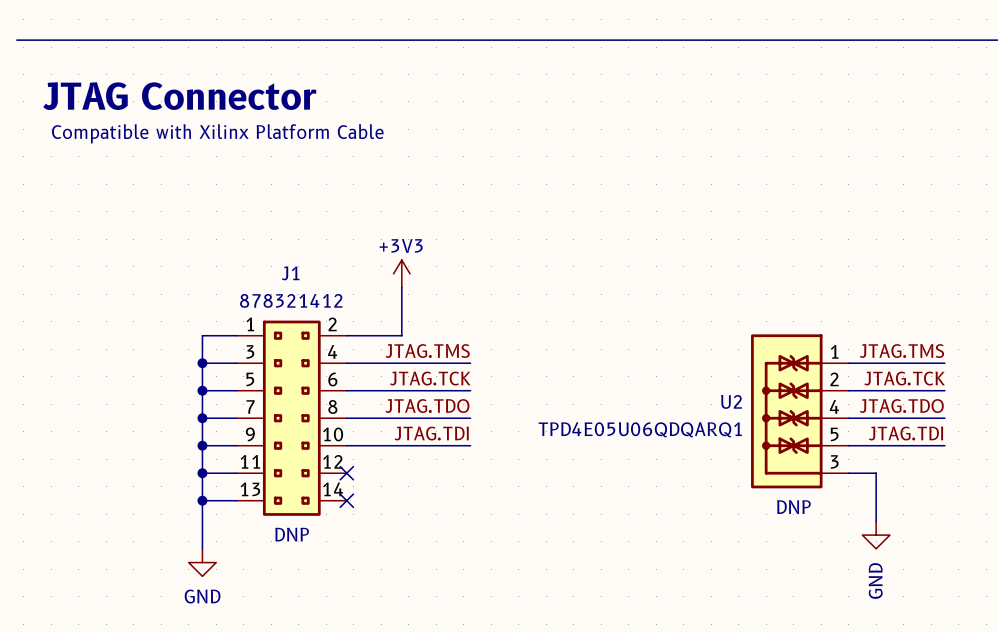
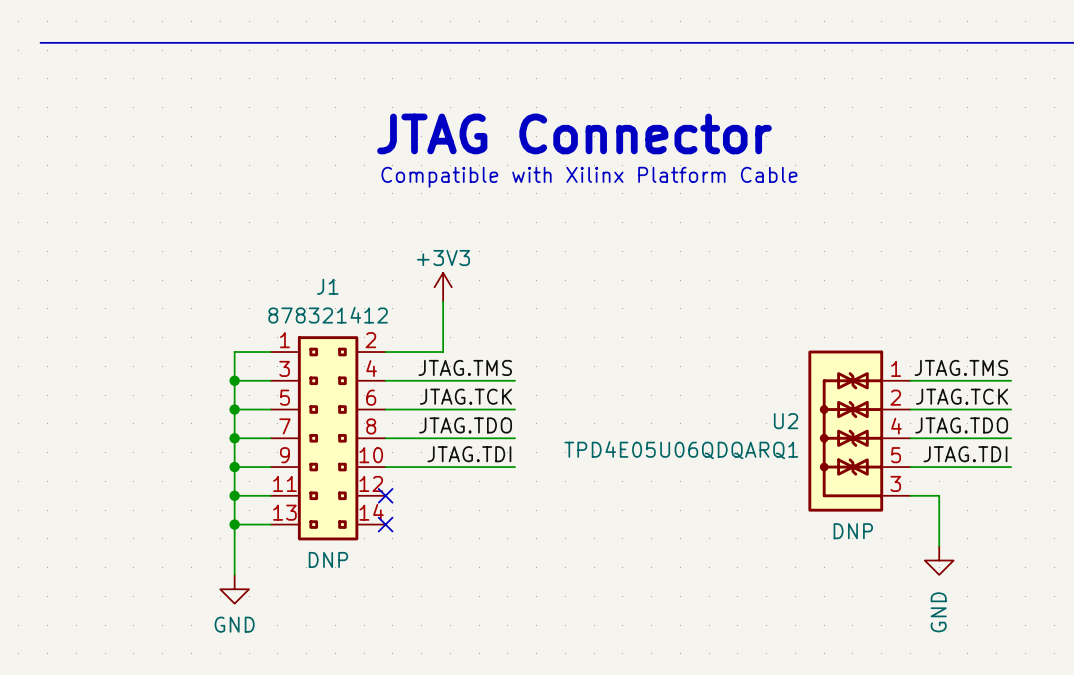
text: JTAG Connector (179, 96) -> none
text: none -> JTAG Connector (574, 133)
text: Compatible with Xilinx Platform Cable (217, 133) -> none
text: none -> Compatible with Xilinx Platform Cable (589, 177)

